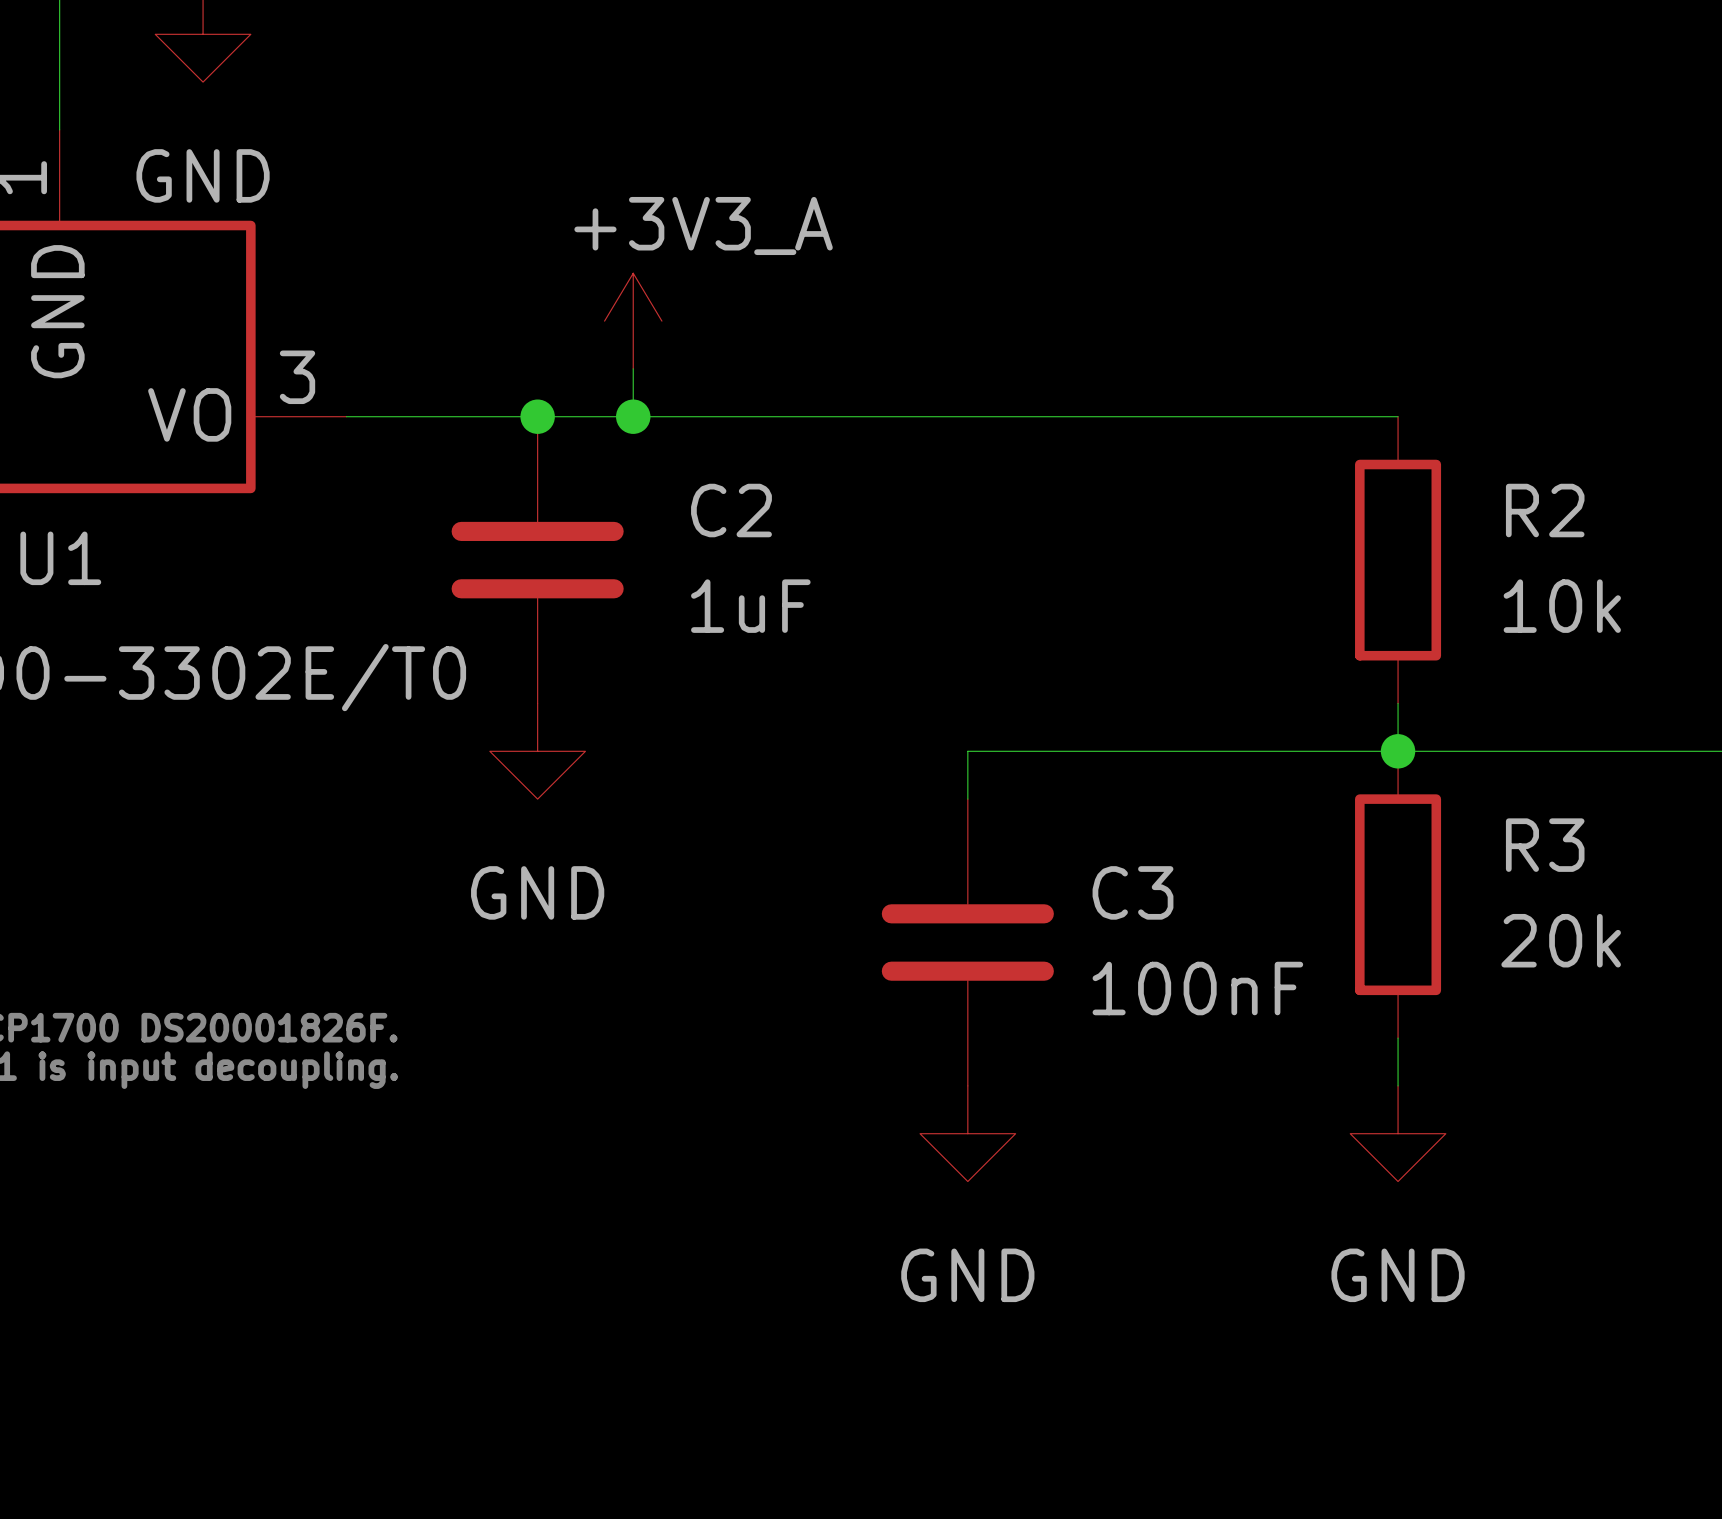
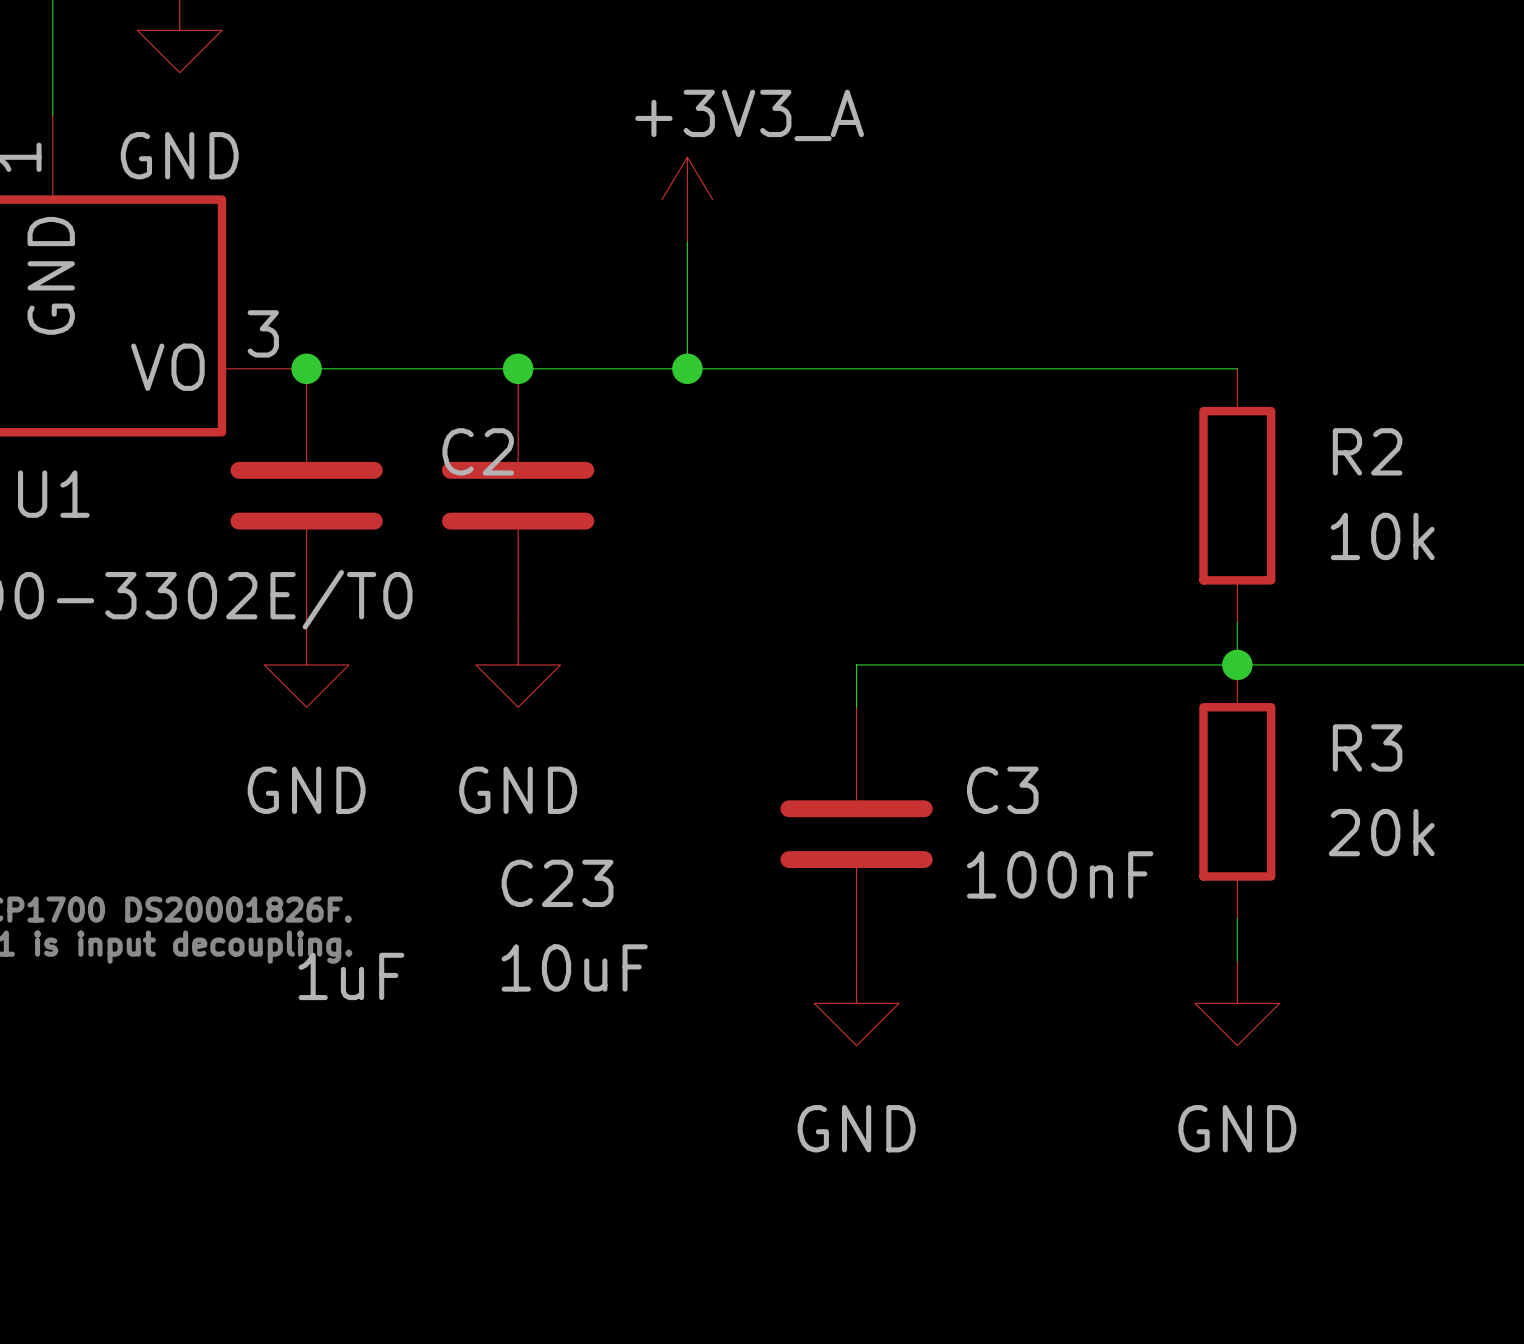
wire: none -> (687, 241) (687, 368)
power symbol position: +3V3_A (633, 321) -> +3V3_A (687, 199)
wire: (633, 368) (633, 416) -> none
junction: none -> (306, 368)
junction: (537, 416) -> none
junction: none -> (518, 368)
junction: (633, 416) -> none
junction: none -> (687, 368)
C2 position: (537, 560) -> (306, 495)
C23: none -> 10uF (518, 495)
C2 value position: 1uF (750, 606) -> 1uF (351, 976)
power symbol: none -> GND (306, 664)
power symbol position: GND (537, 751) -> GND (518, 664)

